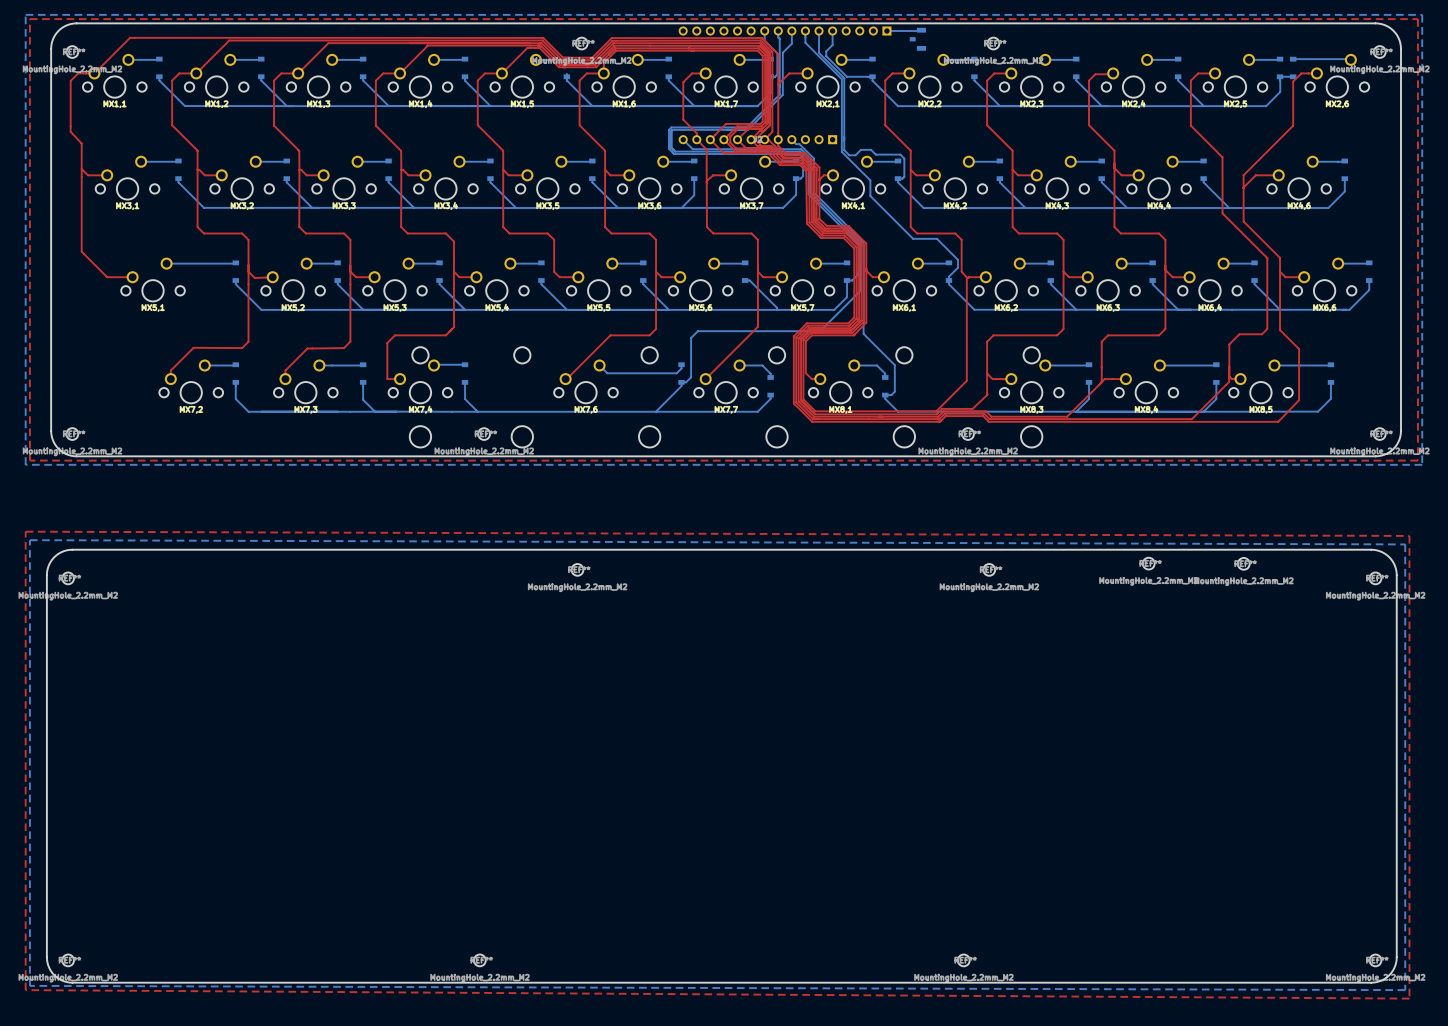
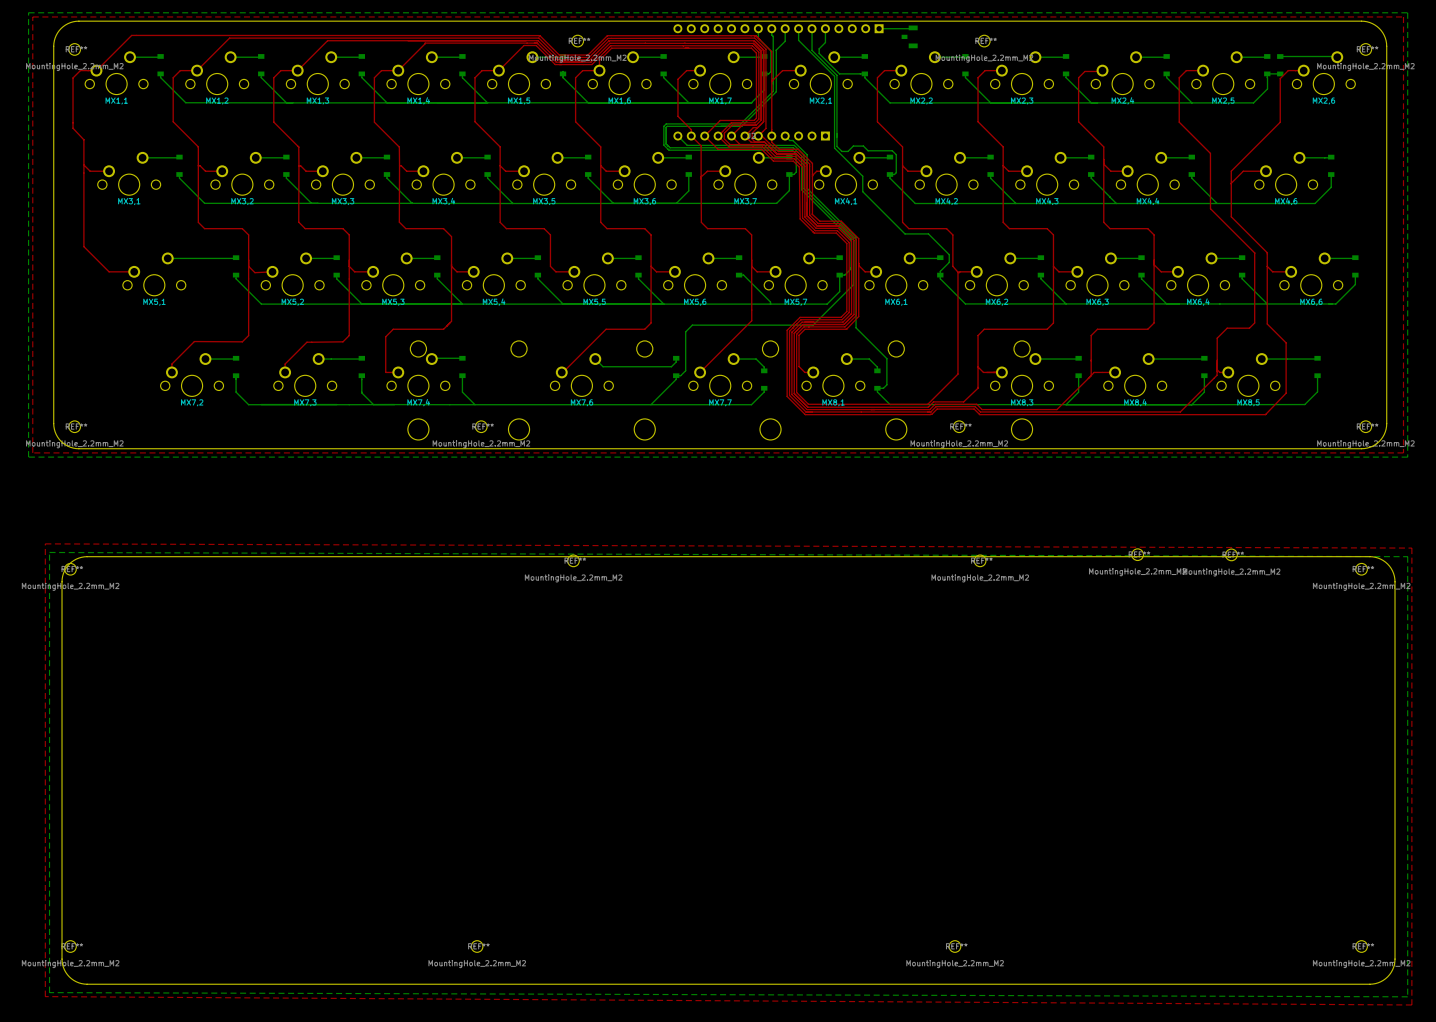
top zone outline: (25, 531) (25, 990) (1409, 998) (1409, 535) (25, 531) -> (45, 543) (45, 996) (1411, 1004) (1411, 548) (45, 543)
bottom zone outline: (29, 540) (29, 985) (1405, 990) (1405, 544) (29, 540) -> (49, 552) (49, 992) (1407, 996) (1407, 556) (49, 552)
board edge: (72, 549) (1371, 549) (1379, 551) (1391, 559) (1396, 575) (1395, 965) (1384, 978) (1371, 982) (63, 981) (50, 970) (46, 957) (46, 575) (49, 564) (54, 557) (61, 552) (72, 549) -> (87, 556) (1369, 556) (1378, 558) (1389, 566) (1395, 581) (1393, 967) (1383, 980) (1369, 984) (78, 982) (67, 974) (62, 959) (62, 581) (64, 570) (69, 564) (76, 559) (87, 556)

